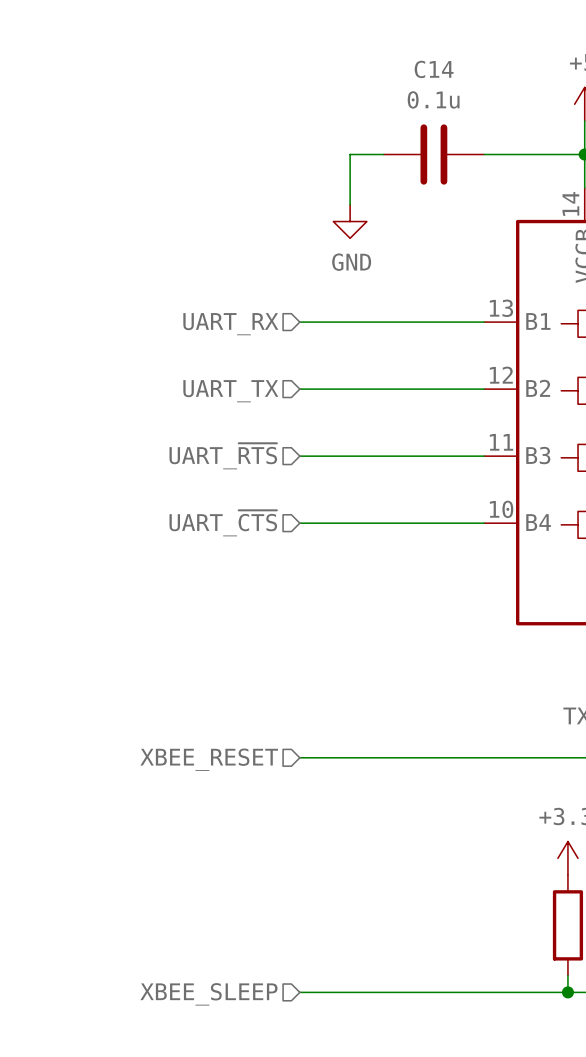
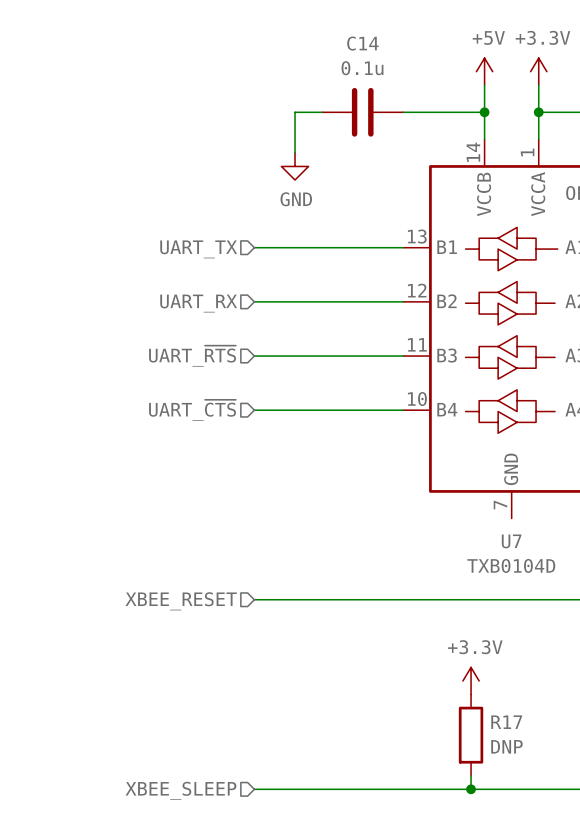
hierarchical label: UART_RX (230, 324) -> UART_TX (198, 249)
hierarchical label: UART_TX (230, 391) -> UART_RX (198, 303)

